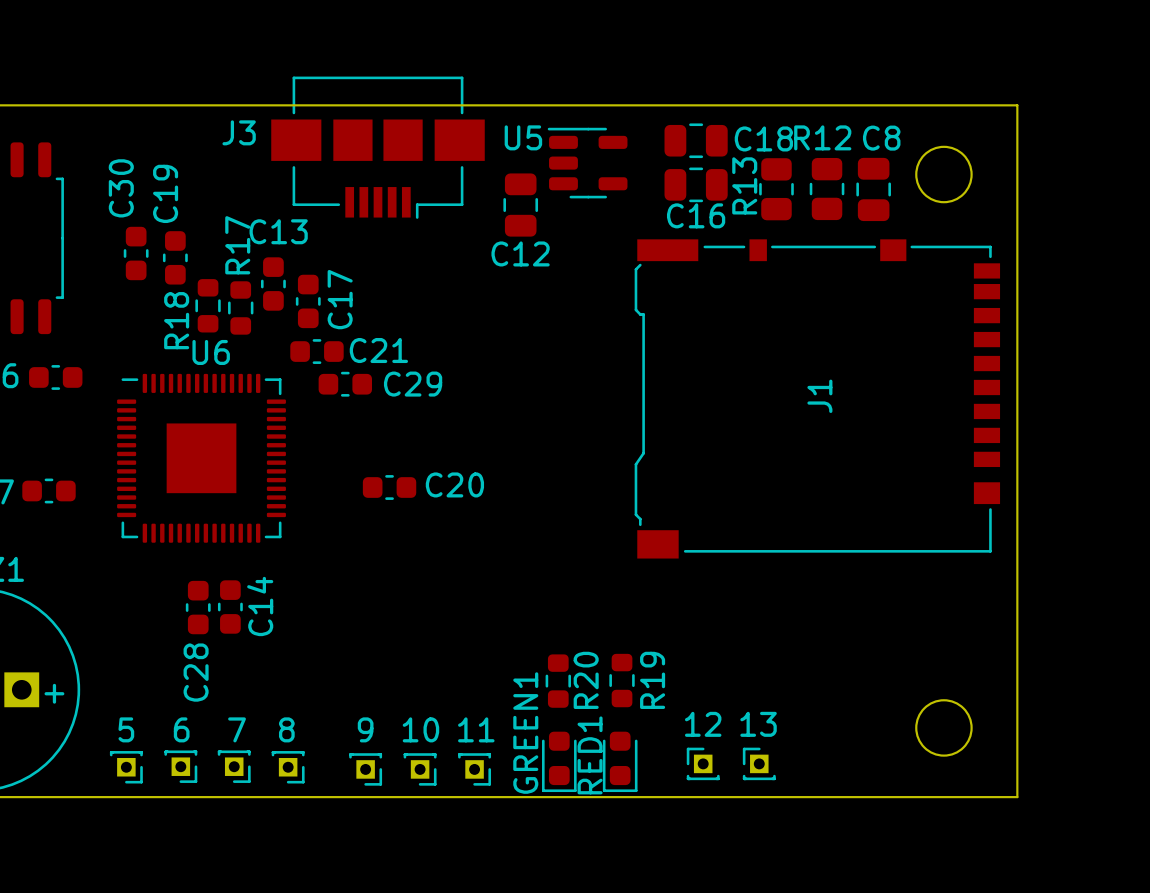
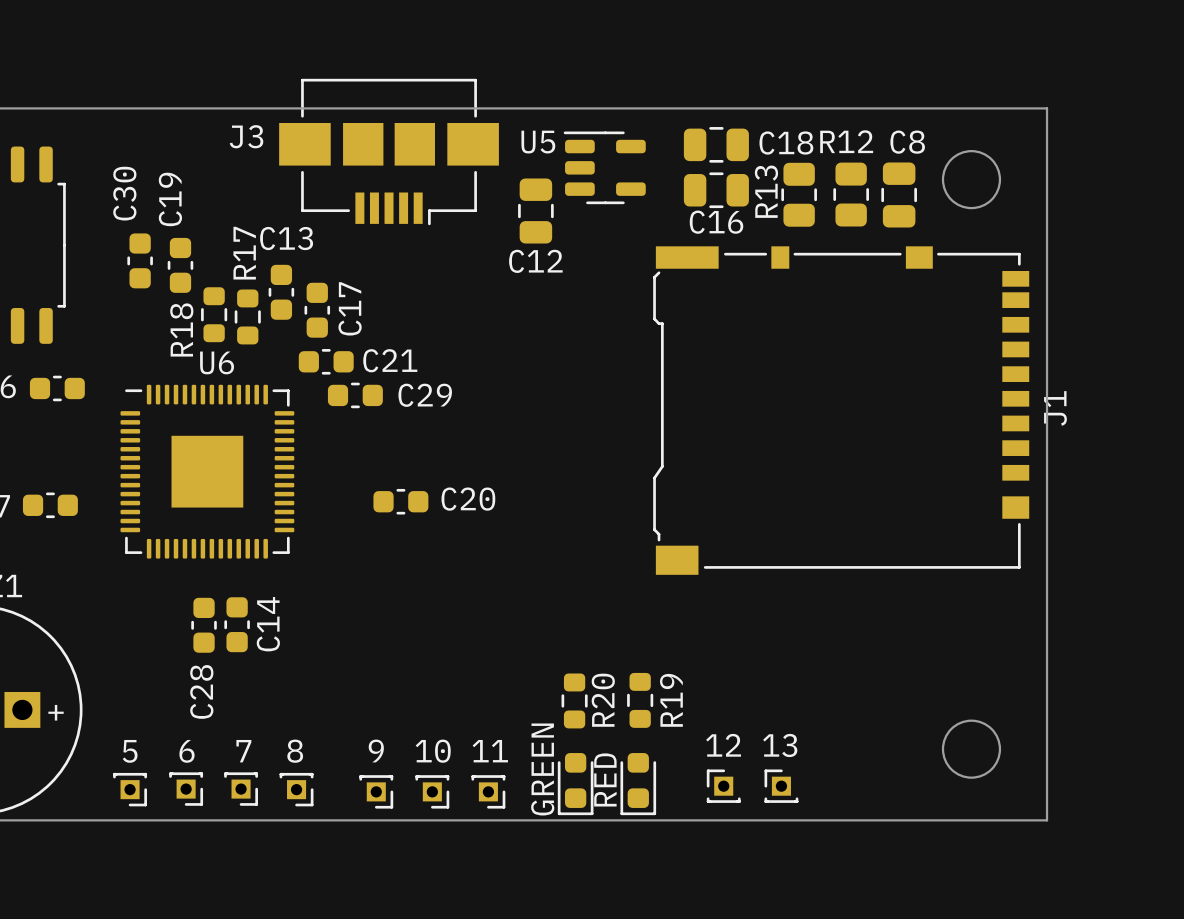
J1 name position: J1 (819, 396) -> J1 (1055, 408)
GREEN1 name: GREEN1 (525, 733) -> GREEN (542, 769)
RED1 name: RED1 (590, 755) -> RED (605, 779)

